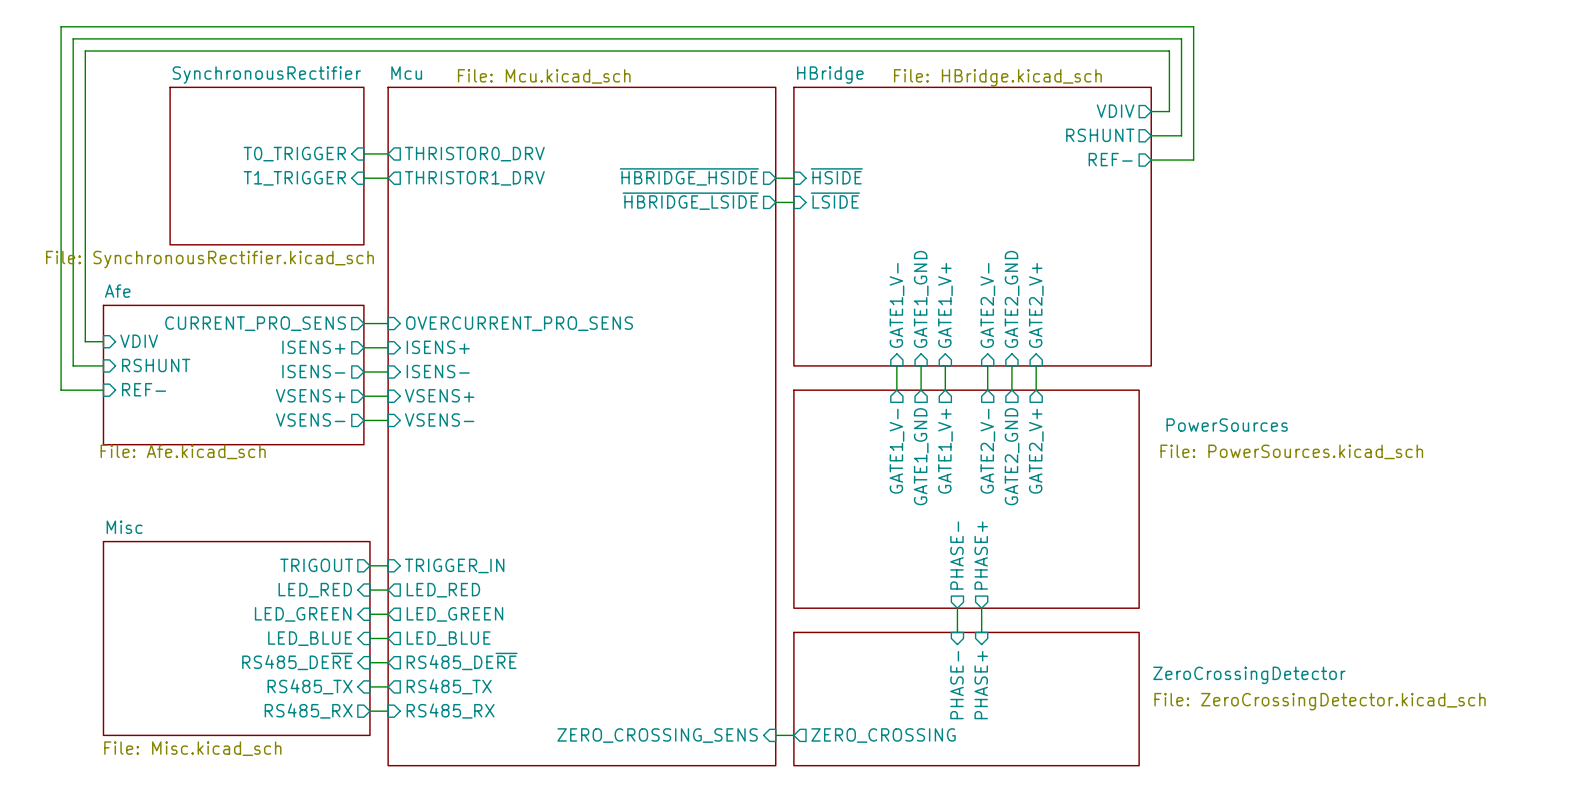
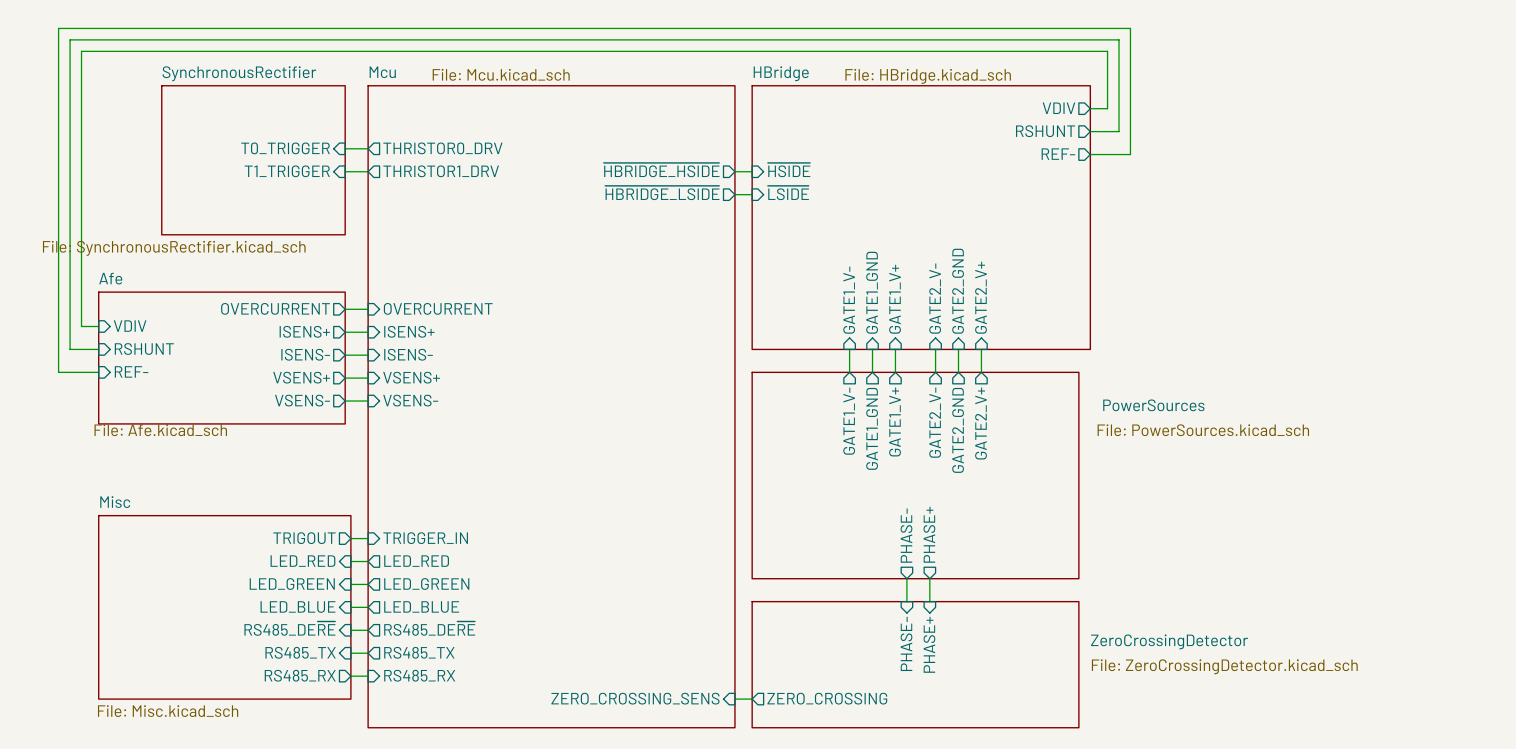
sheet pin: CURRENT_PRO_SENS (255, 323) -> OVERCURRENT (275, 308)
sheet pin: OVERCURRENT_PRO_SENS (519, 323) -> OVERCURRENT (438, 308)

